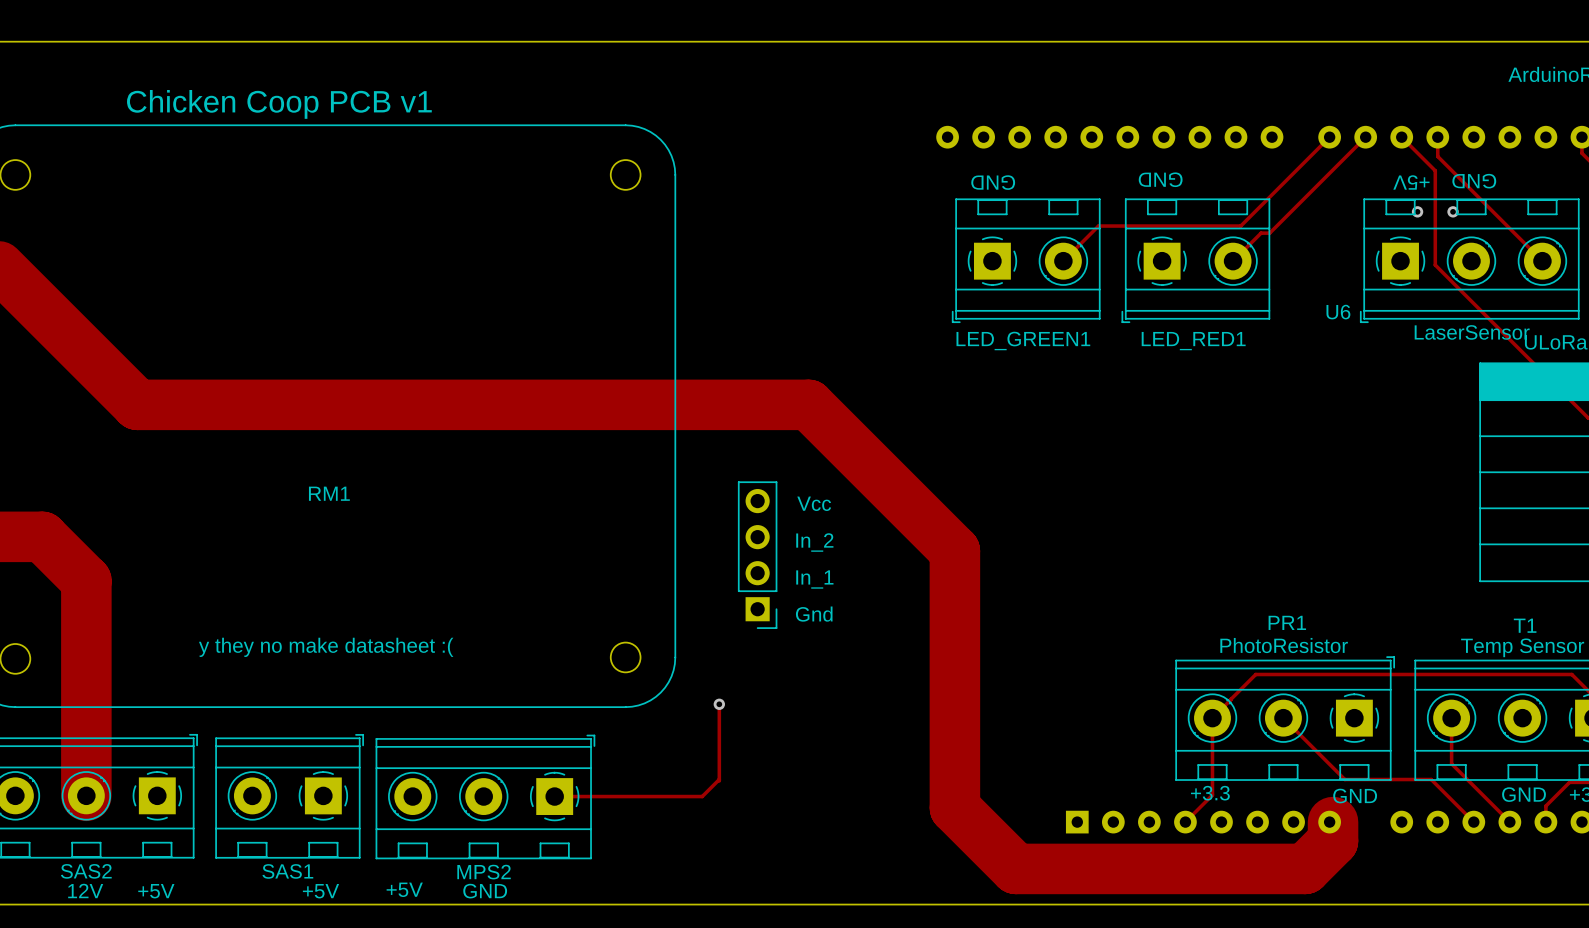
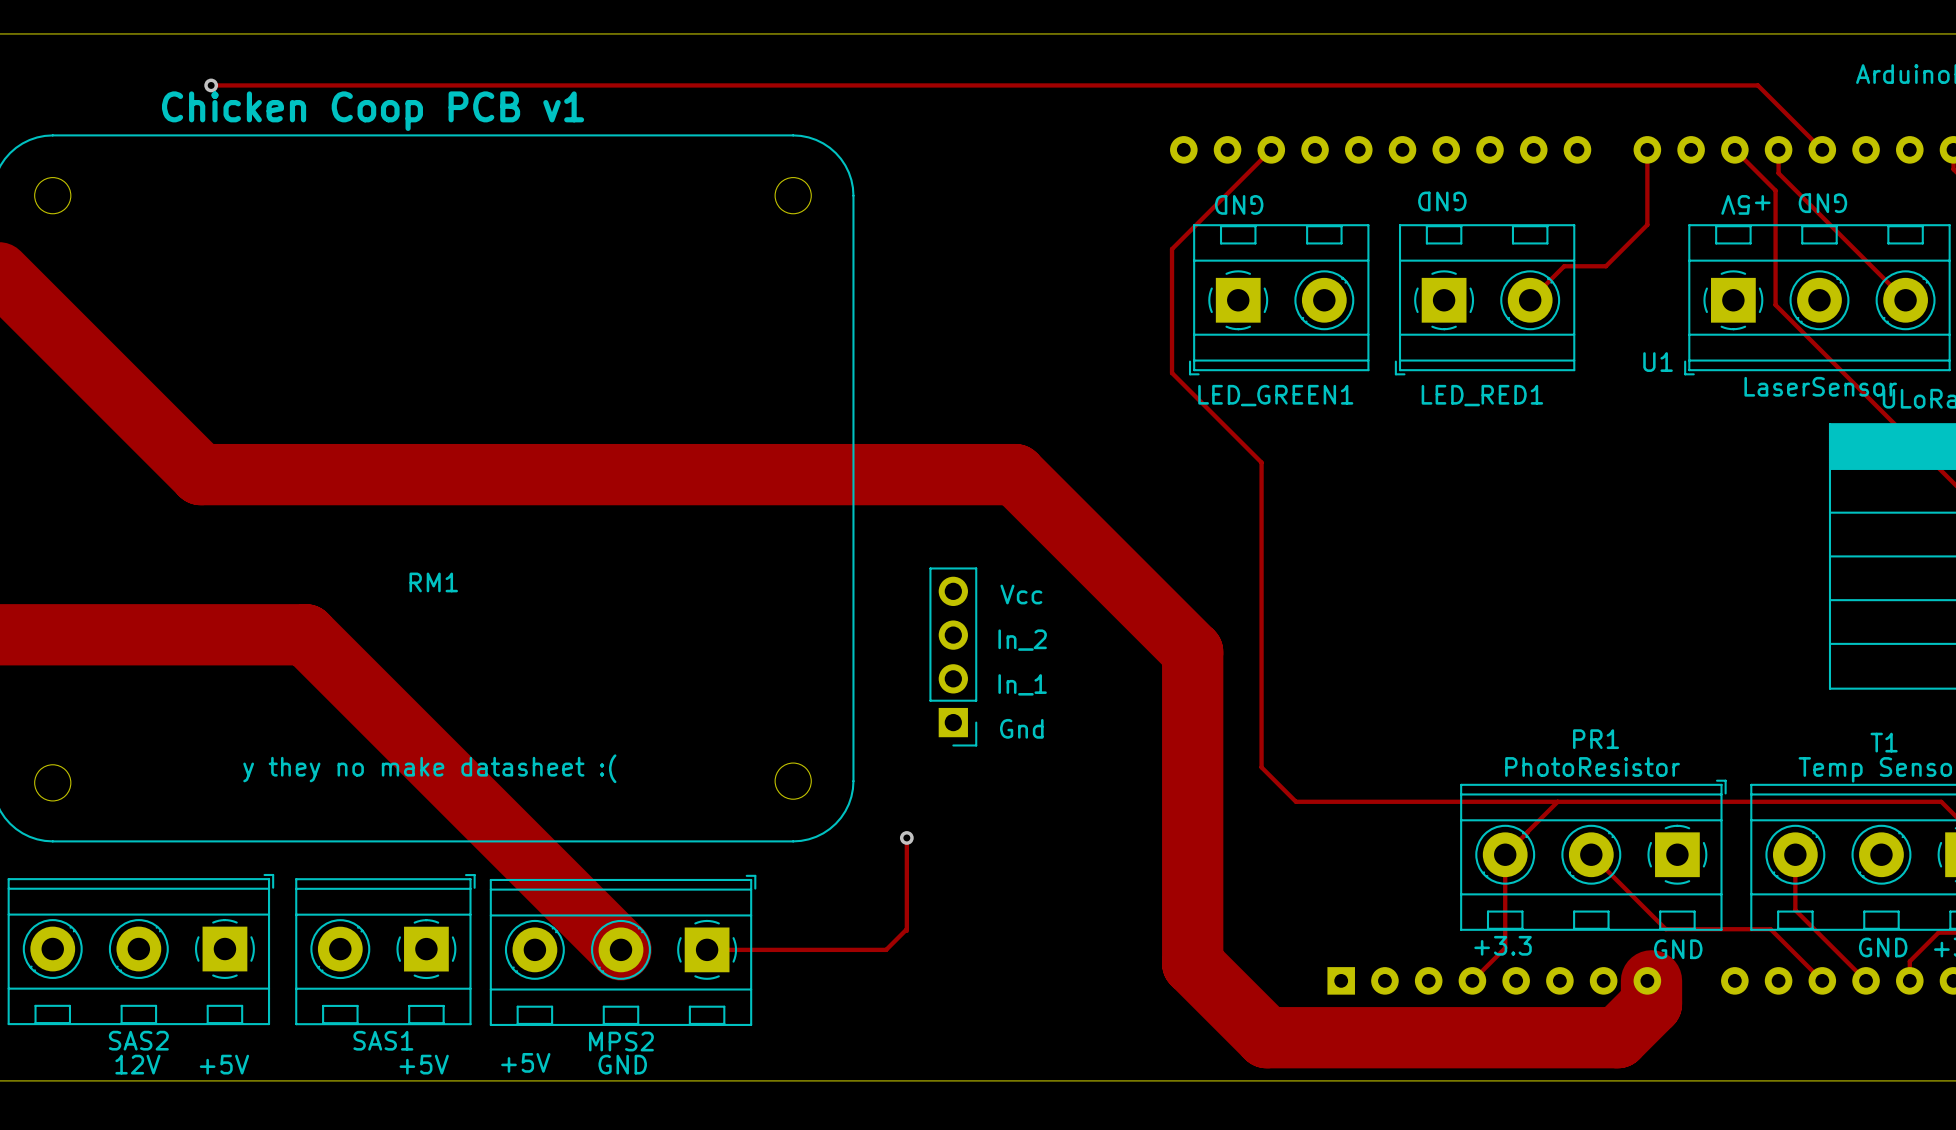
track: none -> (211, 85) (1757, 85) (1822, 149)
via: none -> (211, 85)
track: none -> (1271, 149) (1172, 249) (1172, 373) (1261, 462) (1261, 767) (1296, 801) (1557, 801)
track: (1329, 137) (1240, 226) (1098, 226) (1063, 261) -> none
track: (1365, 137) (1269, 233) -> (1647, 149) (1647, 224) (1605, 266) (1574, 266)
via: (1417, 211) -> none
via: (1453, 211) -> none
U6 name: U6 (1338, 312) -> U1 (1658, 362)
track: (42, 536) (86, 580) (86, 795) -> (85, 634) (305, 634) (620, 949)

